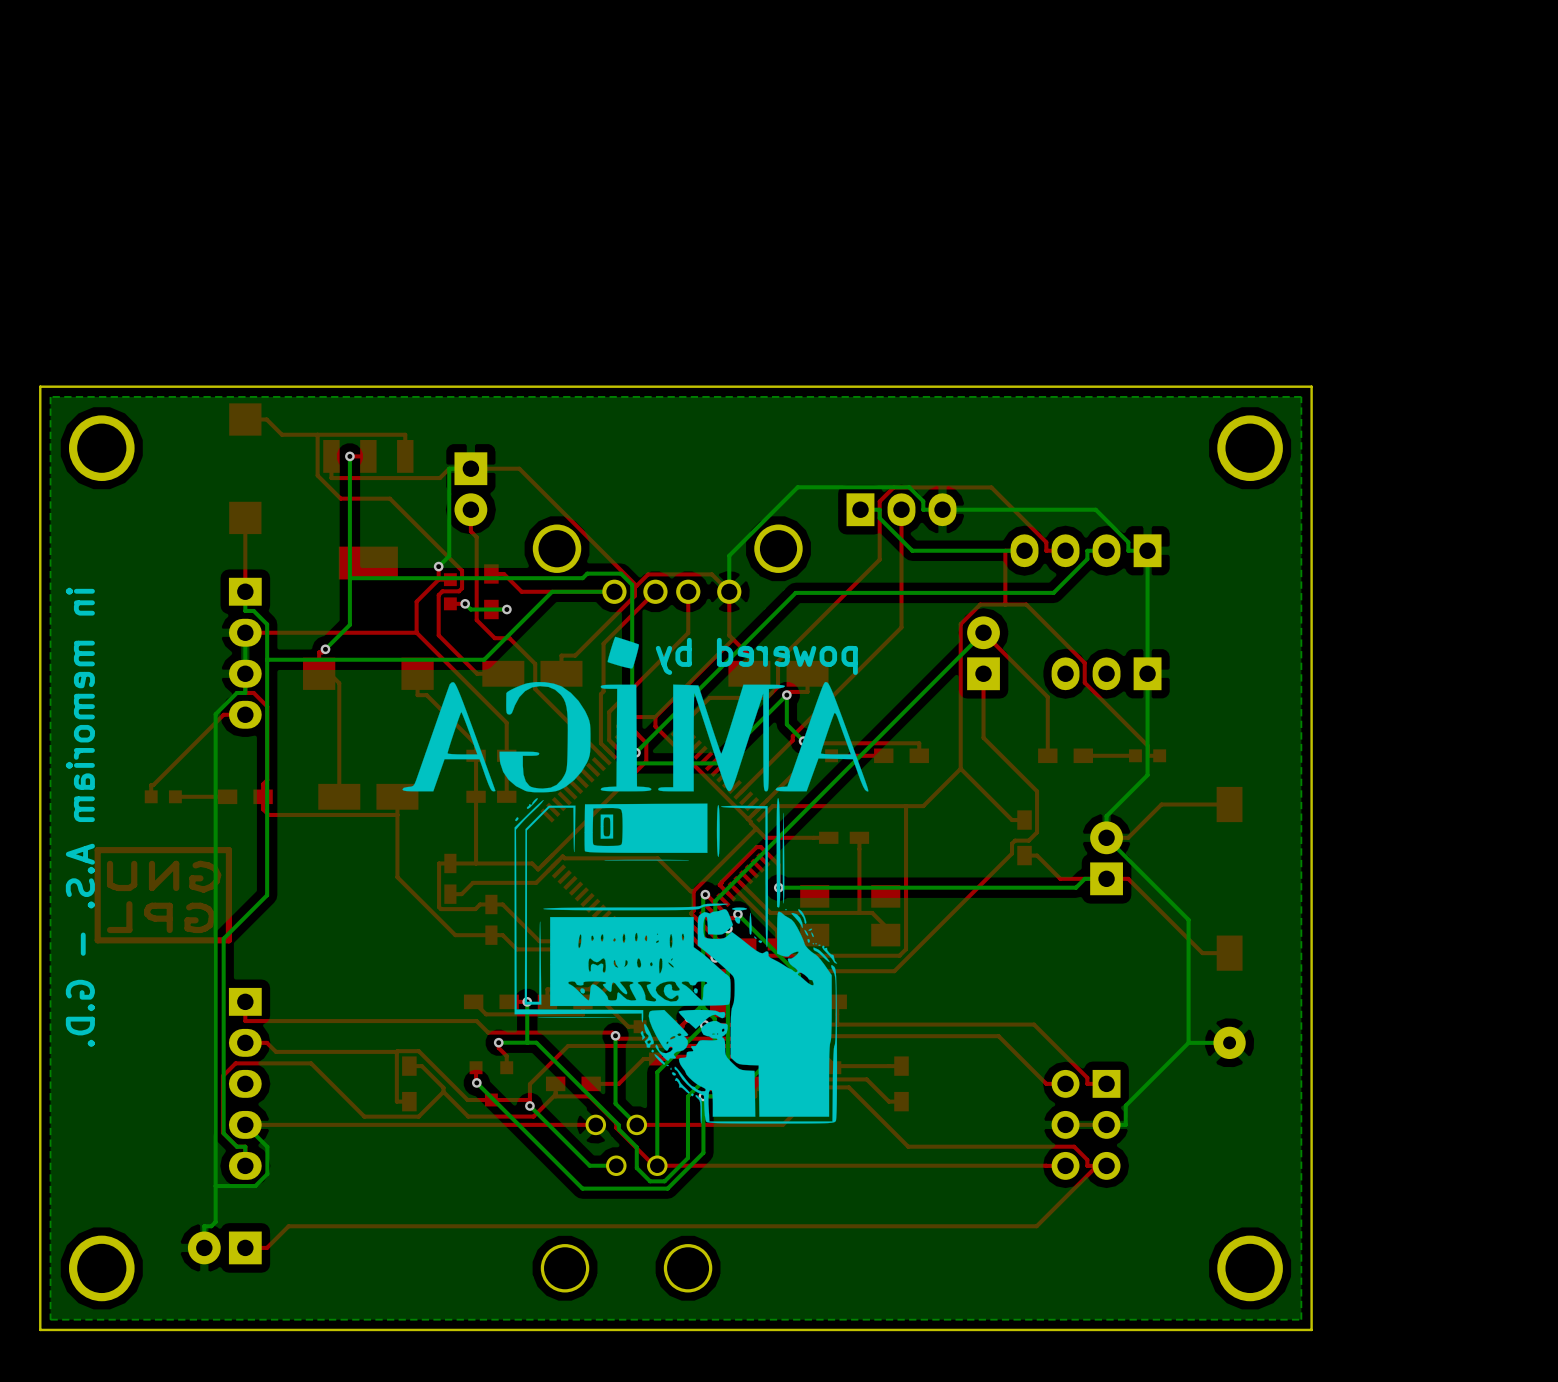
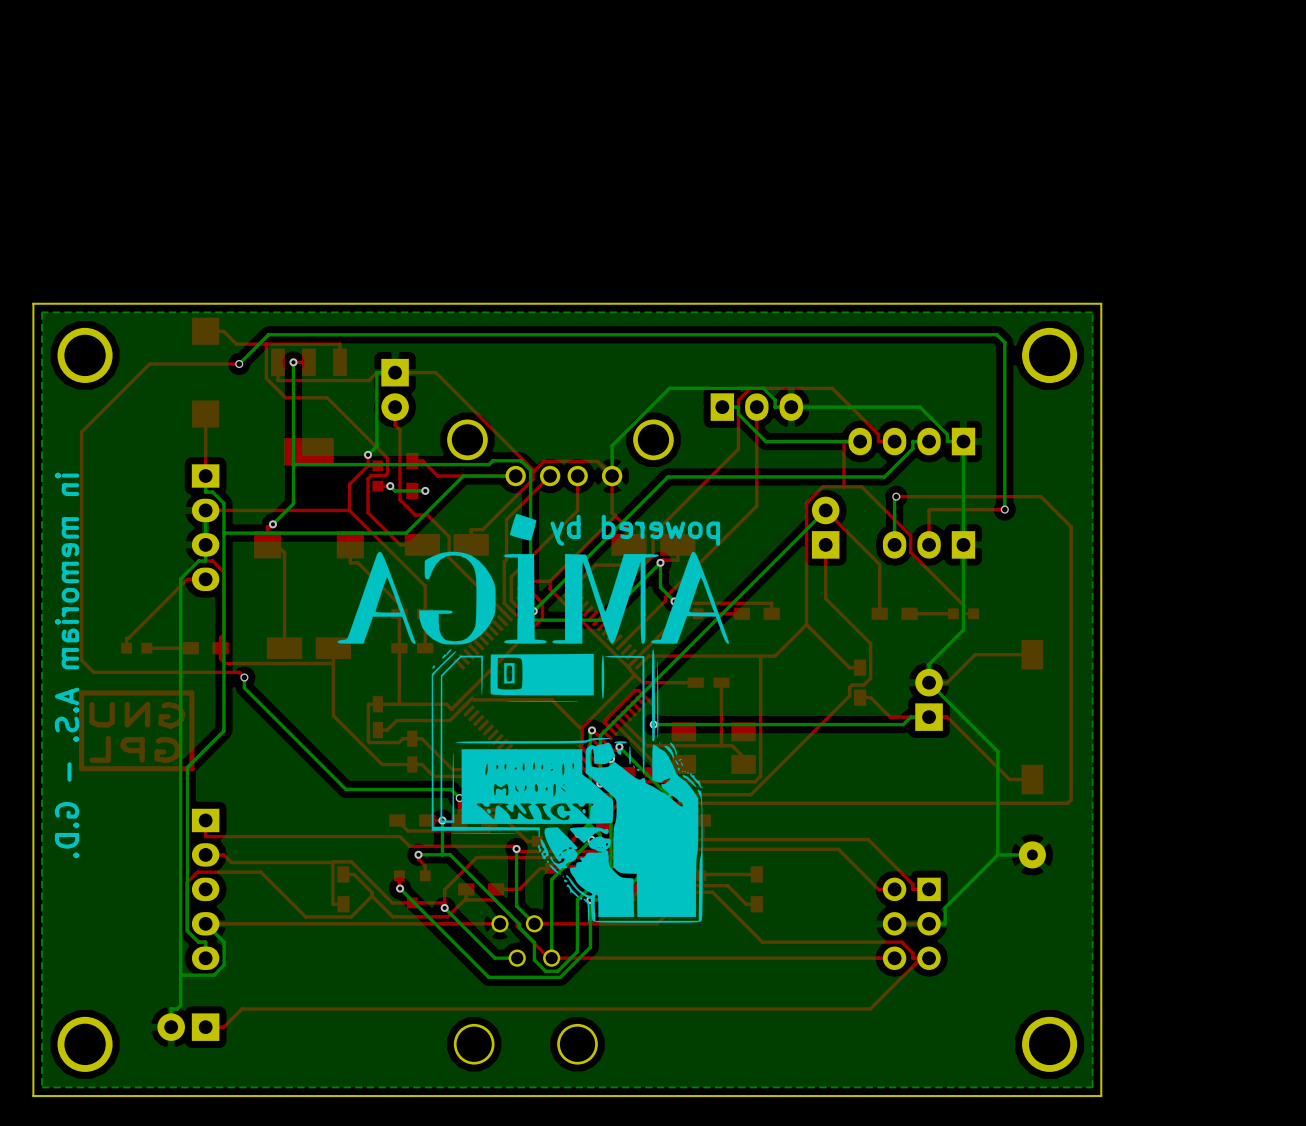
top track: none -> (239, 364) (149, 364) (81, 432) (81, 660) (93, 672) (239, 672) (244, 677)
bottom track: none -> (239, 364) (268, 334) (997, 334) (1004, 342) (1004, 509)
via: none -> (239, 364)
top track: none -> (896, 496) (1040, 496) (1071, 526) (1071, 799) (1067, 803) (619, 803) (604, 818)
bottom track: none -> (896, 496) (894, 498) (894, 544)
via: none -> (896, 496)
top track: none -> (1004, 509) (929, 509) (929, 544)
via: none -> (1004, 509)
bottom track: none -> (244, 677) (244, 687) (346, 789) (451, 789) (459, 798)
via: none -> (244, 677)
top track: none -> (459, 798) (459, 809)
via: none -> (459, 798)

